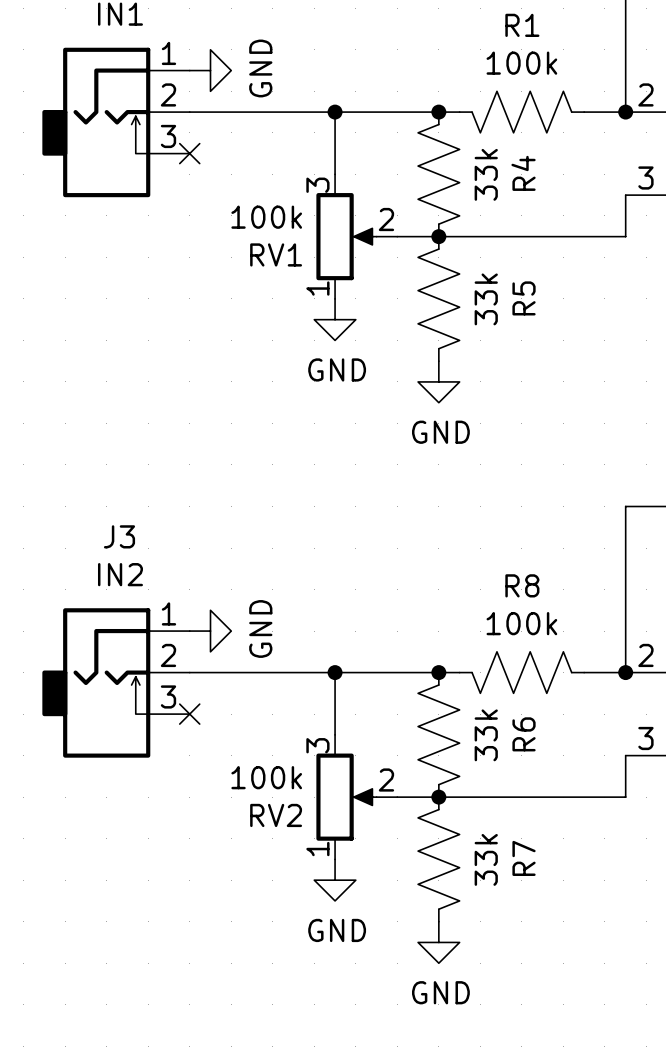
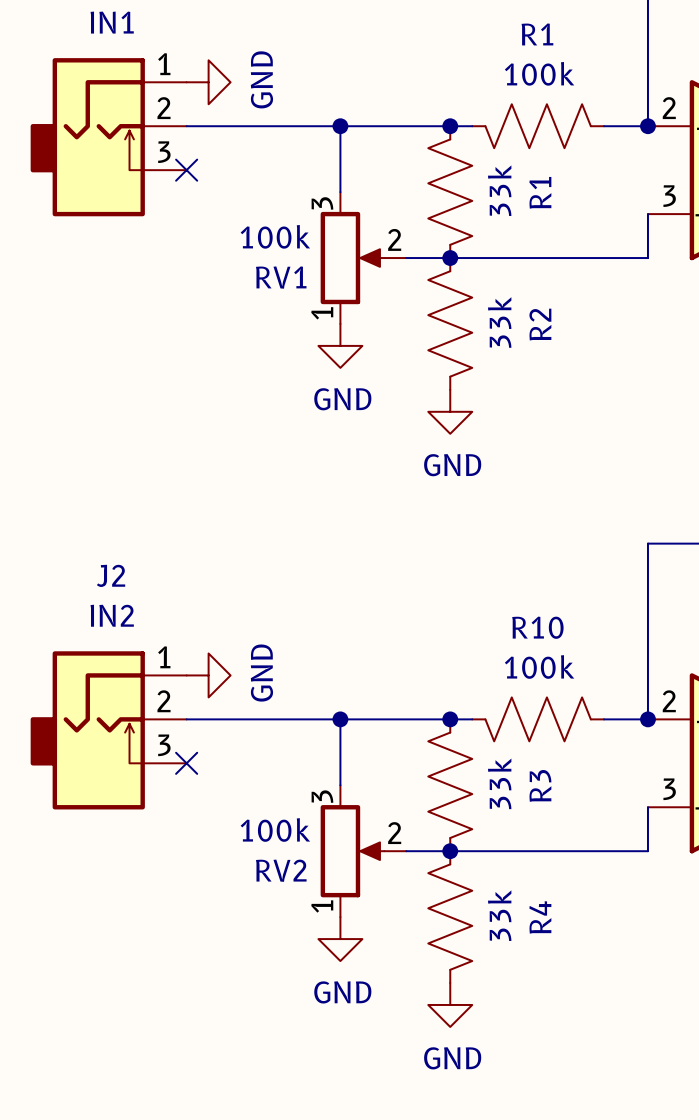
R4 name: R4 (523, 173) -> R1 (540, 192)
R5 name: R5 (524, 298) -> R2 (540, 324)
J3 name: J3 (119, 536) -> J2 (111, 575)
R8 name: R8 (522, 585) -> R10 (537, 627)
R6 name: R6 (524, 734) -> R3 (540, 785)
R7 name: R7 (524, 858) -> R4 (540, 917)

